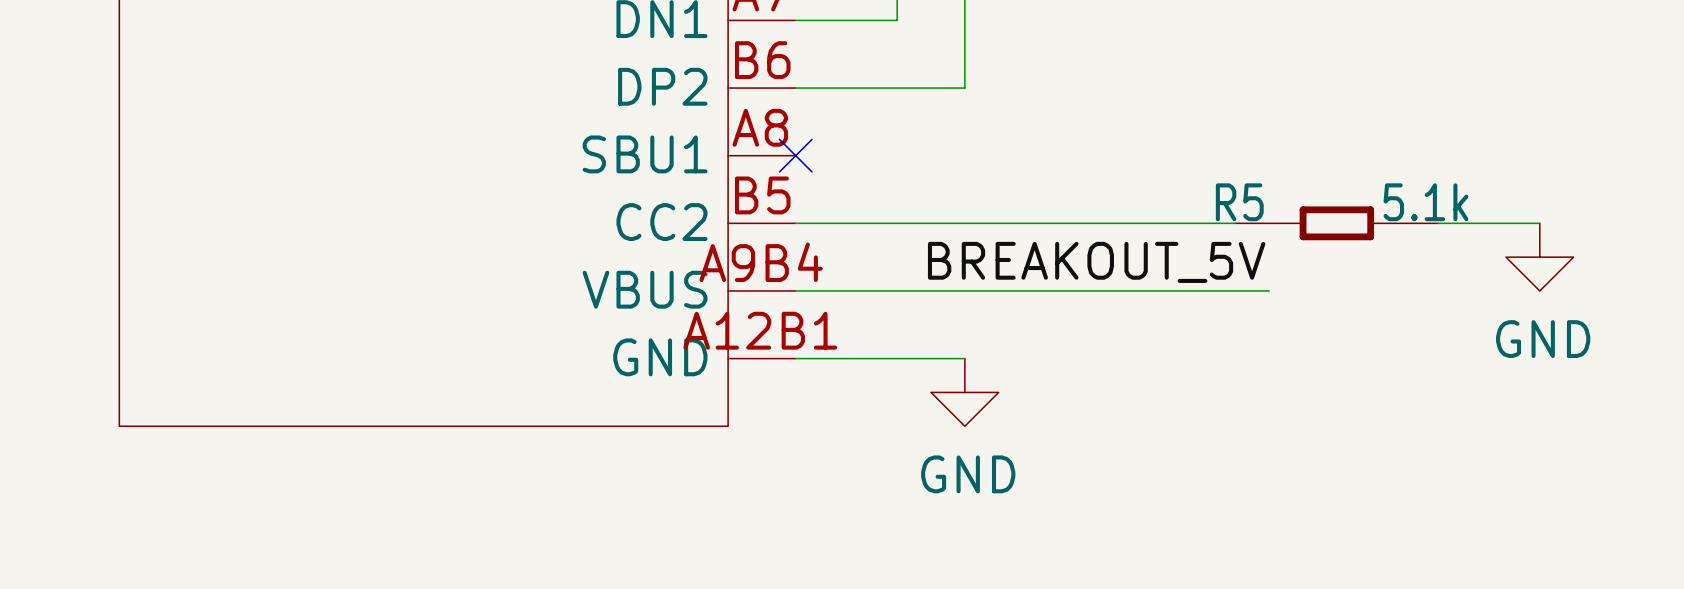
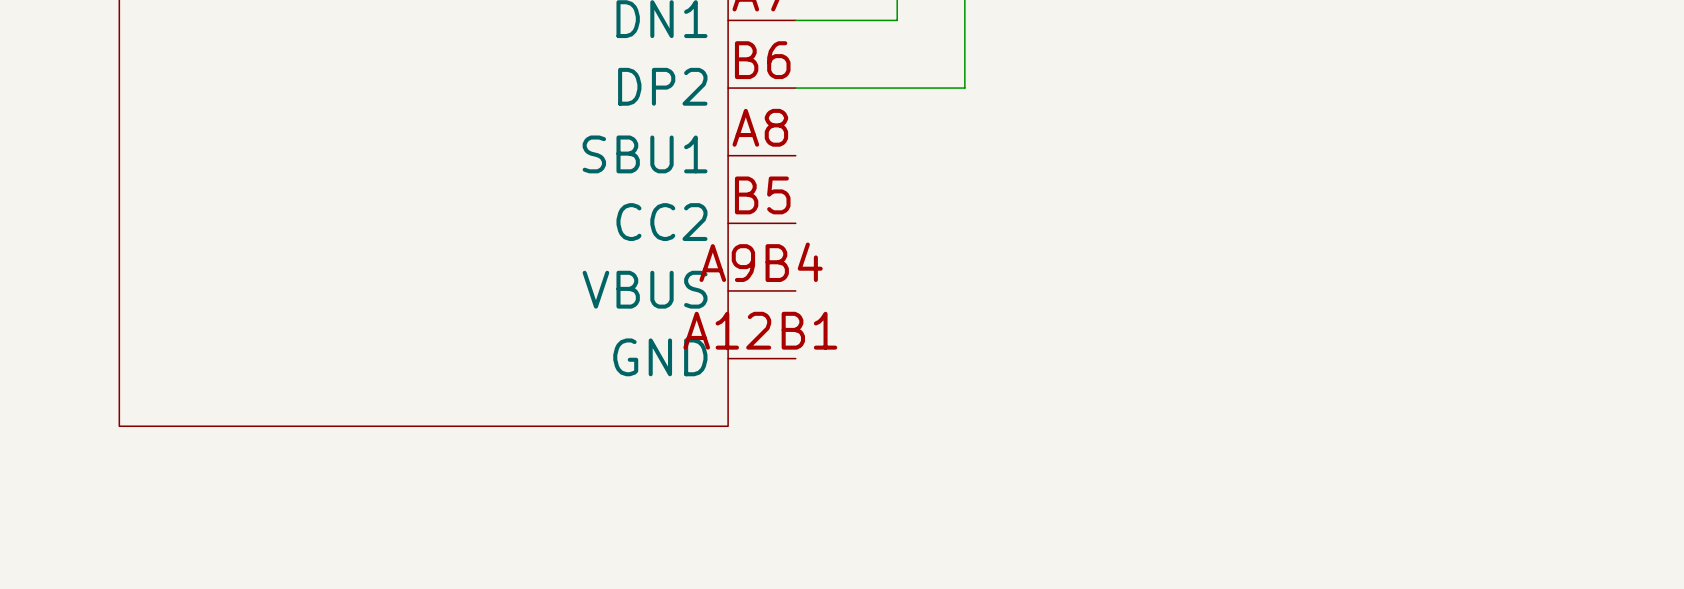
no-connect mark: (795, 155) -> none
wire: (795, 223) (1235, 223) -> none
R5: 5.1k (1336, 223) -> none
wire: (1438, 223) (1539, 223) -> none
power symbol: GND (1539, 257) -> none
label: BREAKOUT_5V (1096, 262) -> none
wire: (795, 290) (1269, 290) -> none
wire: (795, 358) (964, 358) -> none
power symbol: GND (964, 392) -> none

